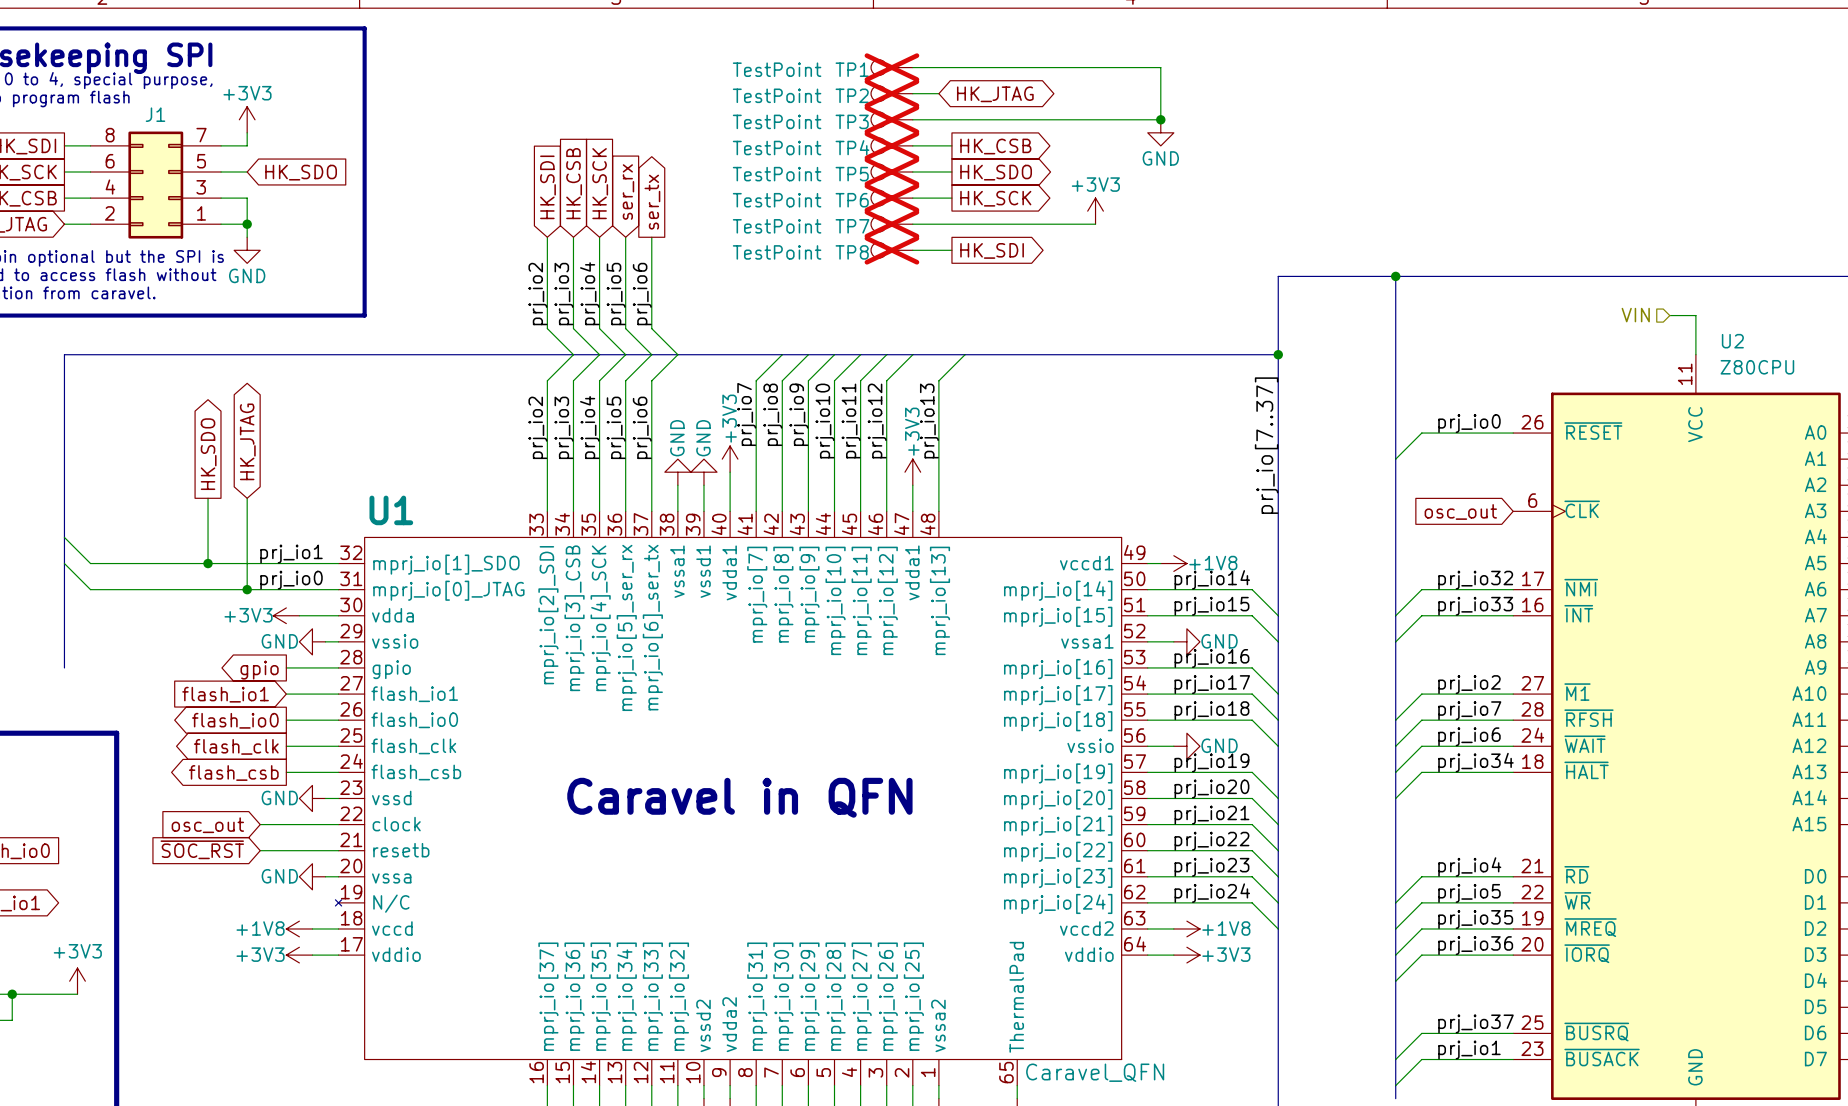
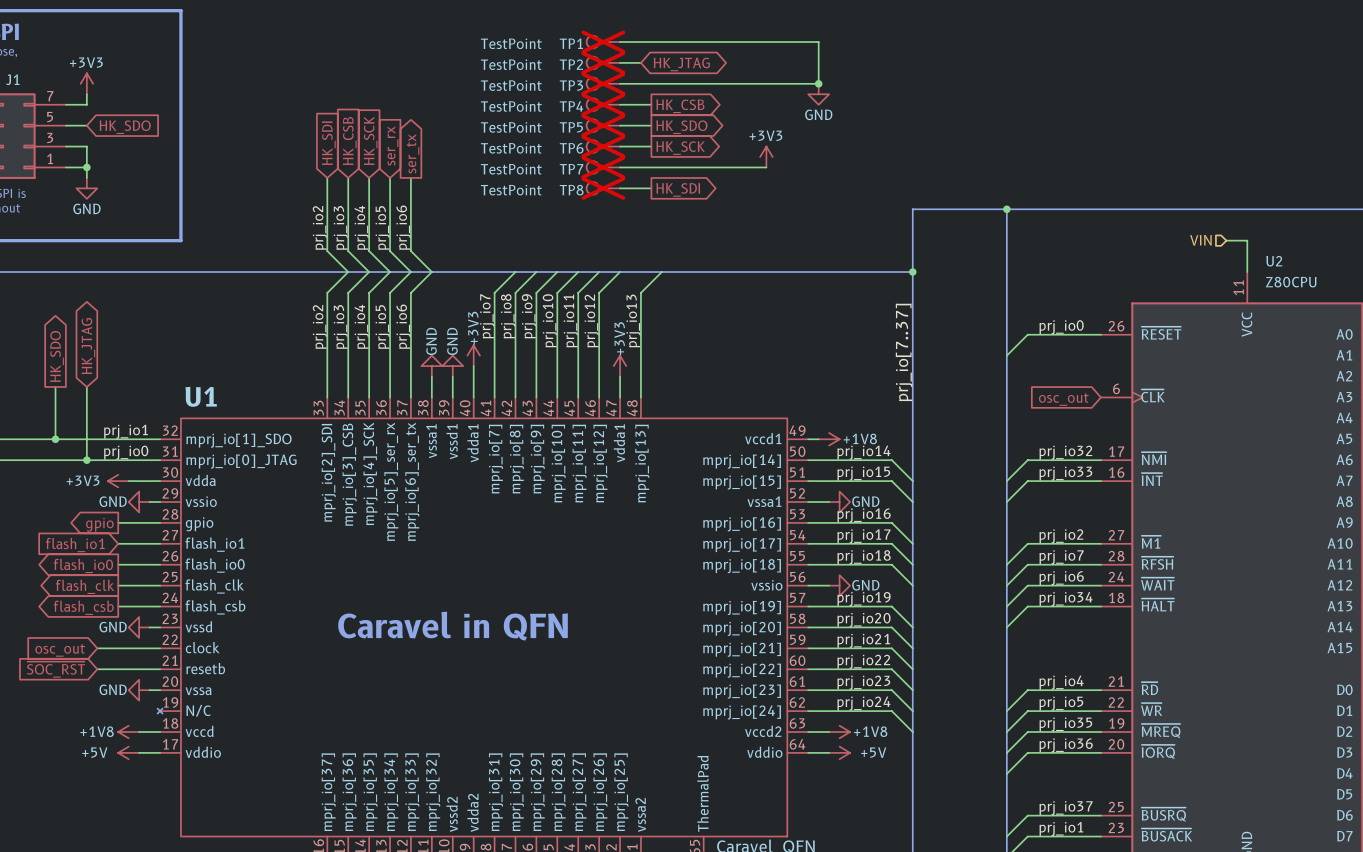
power symbol: +3V3 (299, 955) -> +5V (128, 752)
power symbol: +3V3 (1186, 955) -> +5V (839, 752)

